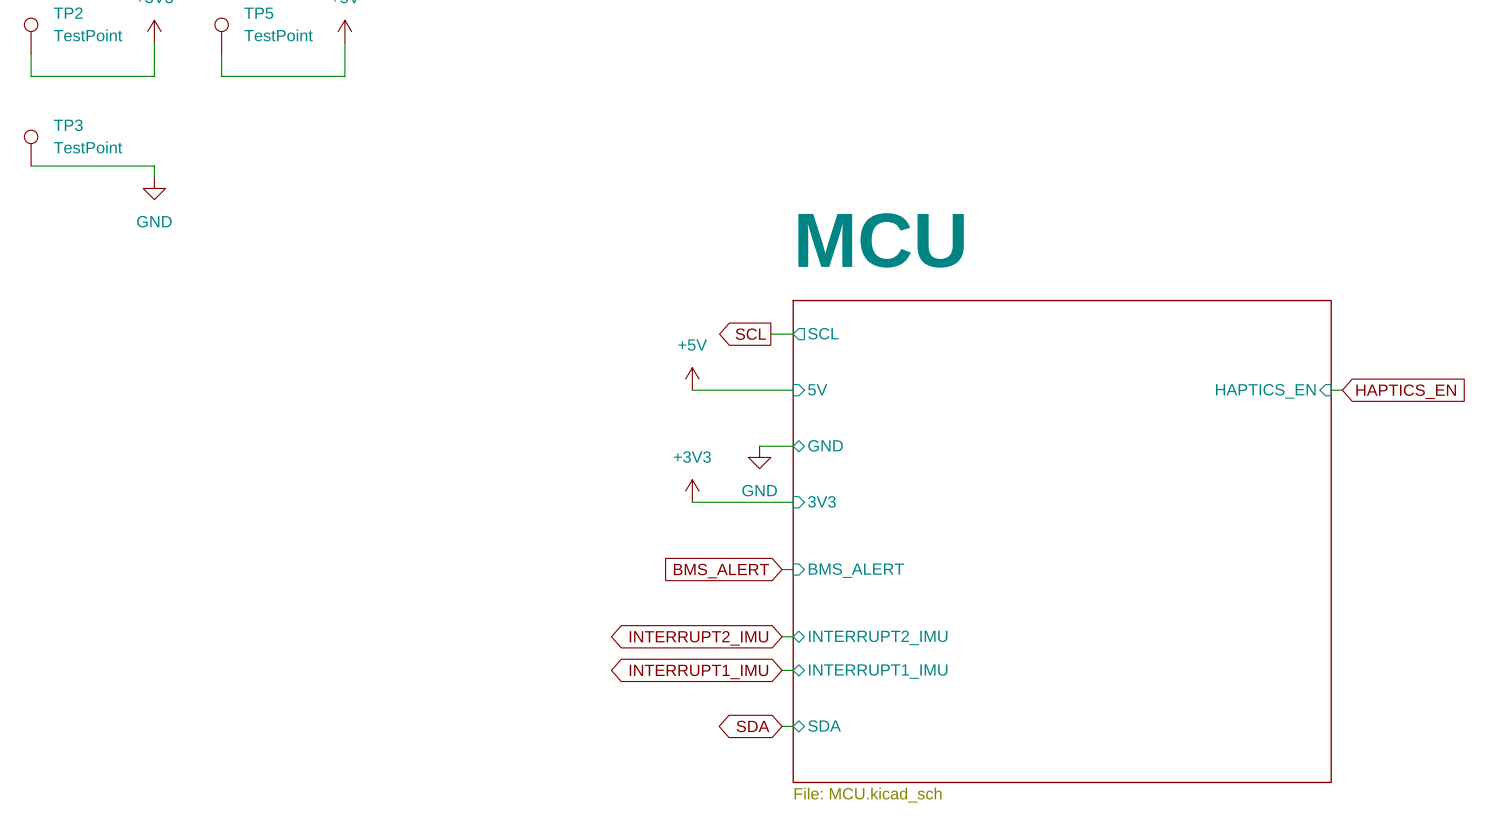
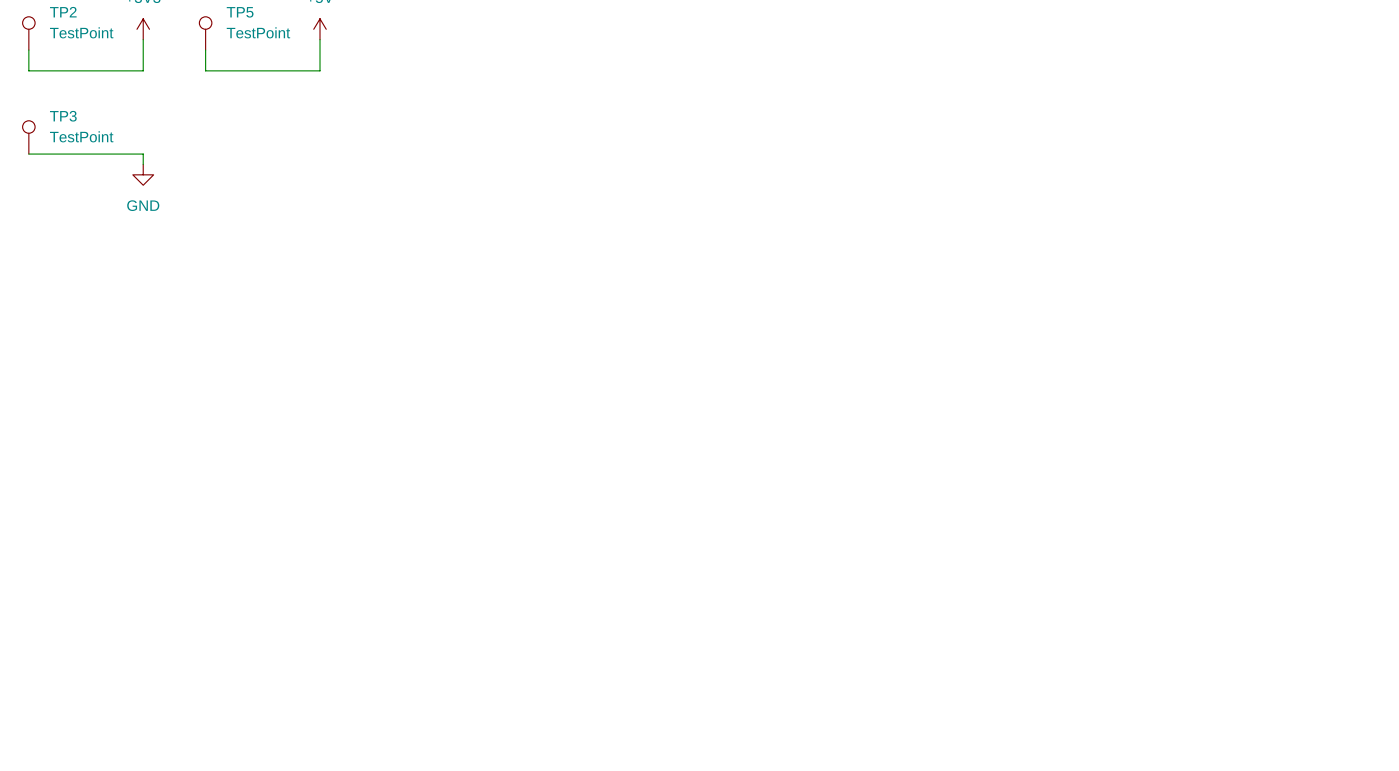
sheet pin: SCL (823, 333) -> none
global label: SCL (750, 334) -> none
wire: (770, 334) (793, 334) -> none
power symbol: +5V (692, 378) -> none
sheet pin: 5V (817, 389) -> none
wire: (692, 390) (793, 390) -> none
wire: (1331, 390) (1342, 390) -> none
sheet pin: HAPTICS_EN (1265, 391) -> none
global label: HAPTICS_EN (1406, 391) -> none
sheet pin: GND (825, 445) -> none
wire: (759, 446) (793, 446) -> none
power symbol: GND (759, 457) -> none
power symbol: +3V3 (692, 491) -> none
sheet pin: 3V3 (821, 501) -> none
wire: (692, 502) (793, 502) -> none
sheet MCU: File: MCU.kicad_sch (1062, 541) -> none
wire: (782, 569) (793, 569) -> none
sheet pin: BMS_ALERT (856, 570) -> none
global label: BMS_ALERT (721, 571) -> none
wire: (782, 636) (793, 636) -> none
sheet pin: INTERRUPT2_IMU (878, 637) -> none
global label: INTERRUPT2_IMU (698, 638) -> none
wire: (782, 670) (793, 670) -> none
sheet pin: INTERRUPT1_IMU (878, 671) -> none
global label: INTERRUPT1_IMU (698, 672) -> none
global label: SDA (753, 726) -> none
wire: (782, 726) (793, 726) -> none
sheet pin: SDA (824, 726) -> none

